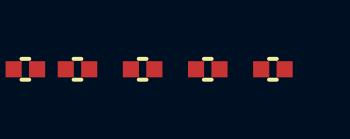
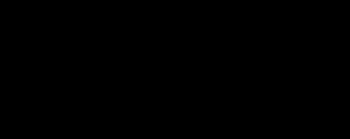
part: (25, 69) -> none
part: (77, 69) -> none
part: (142, 69) -> none
part: (207, 69) -> none
part: (272, 69) -> none

